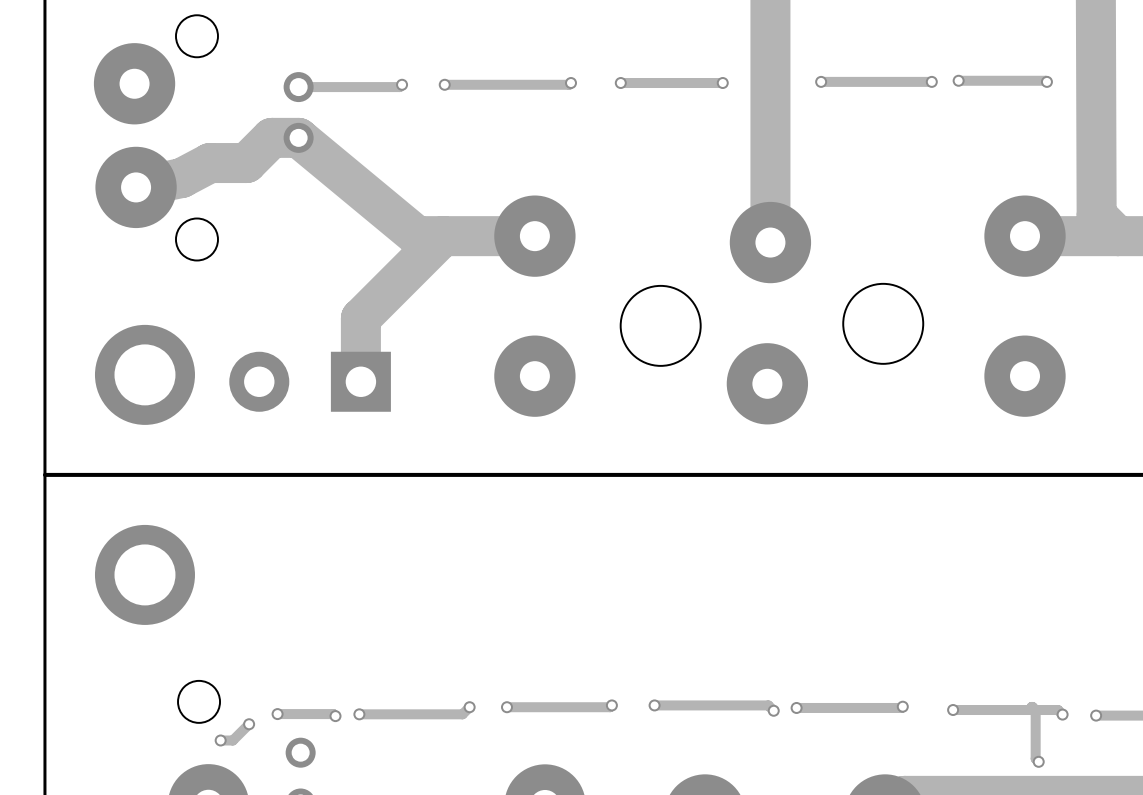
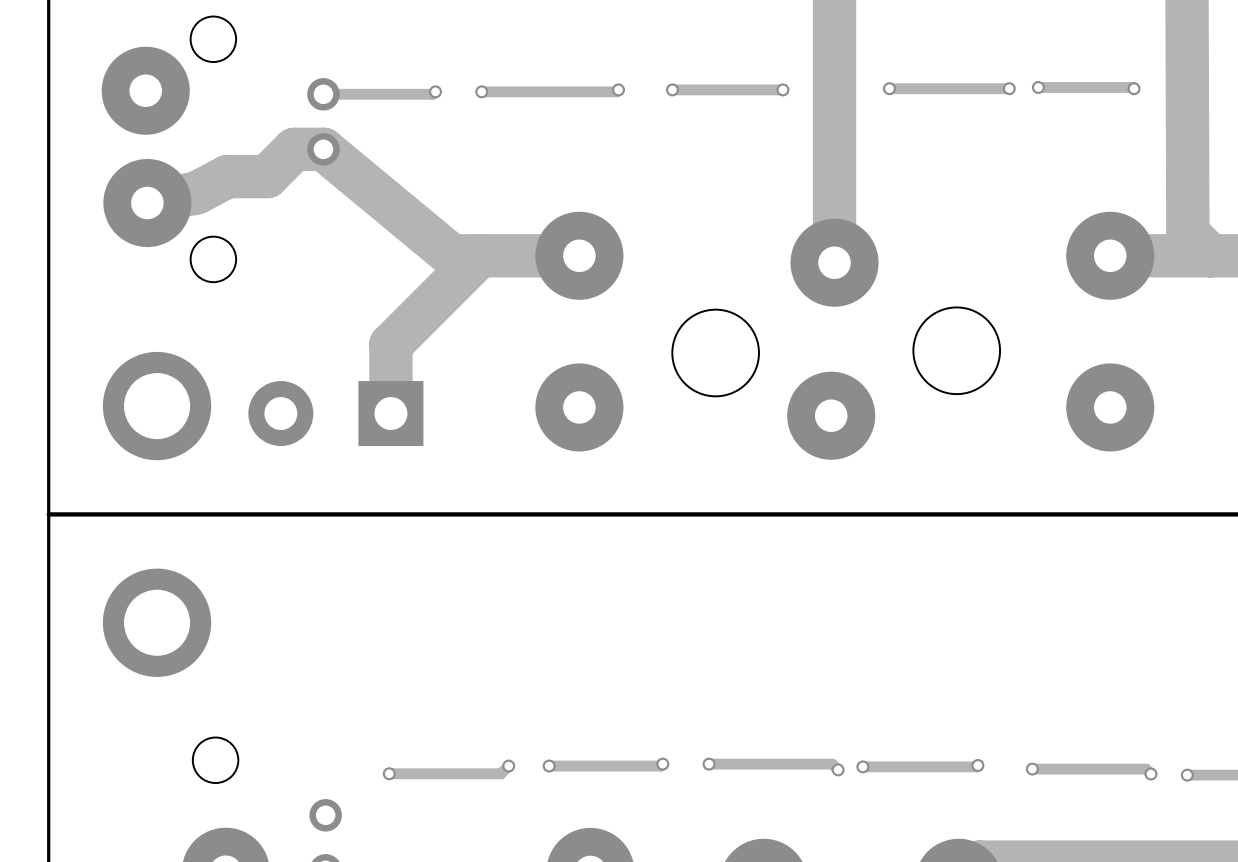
track: (1031, 710) (1031, 706) (1035, 710) (1035, 758) (1038, 761) -> none
track: (277, 714) (333, 714) (335, 716) -> none
via: (277, 714) -> none
via: (335, 716) -> none
track: (249, 724) (232, 740) (220, 740) -> none
via: (249, 724) -> none
via: (220, 740) -> none
via: (1038, 761) -> none

